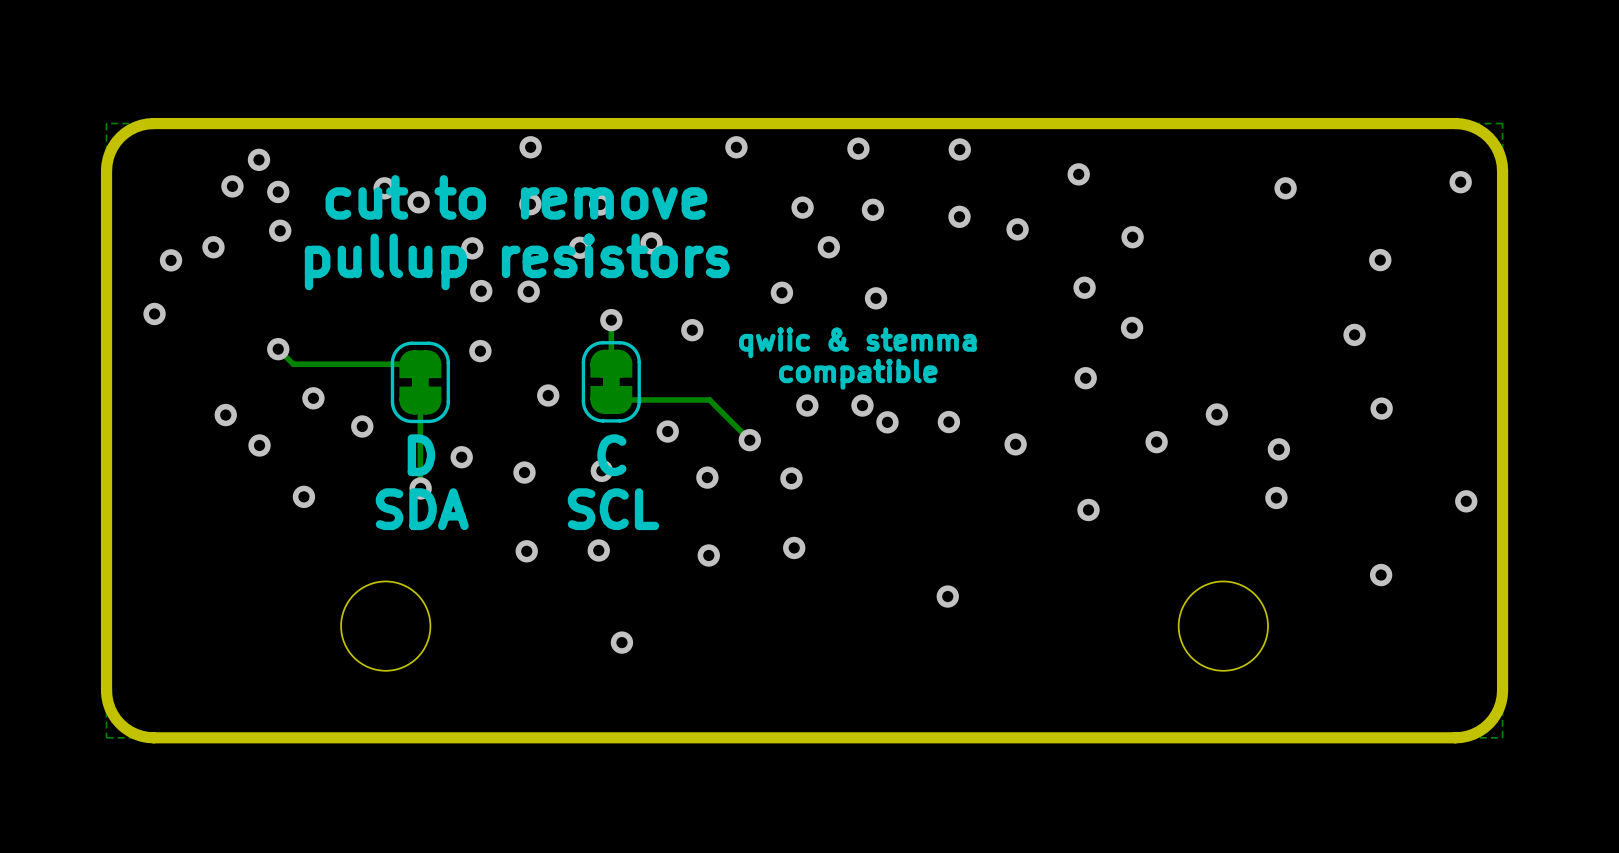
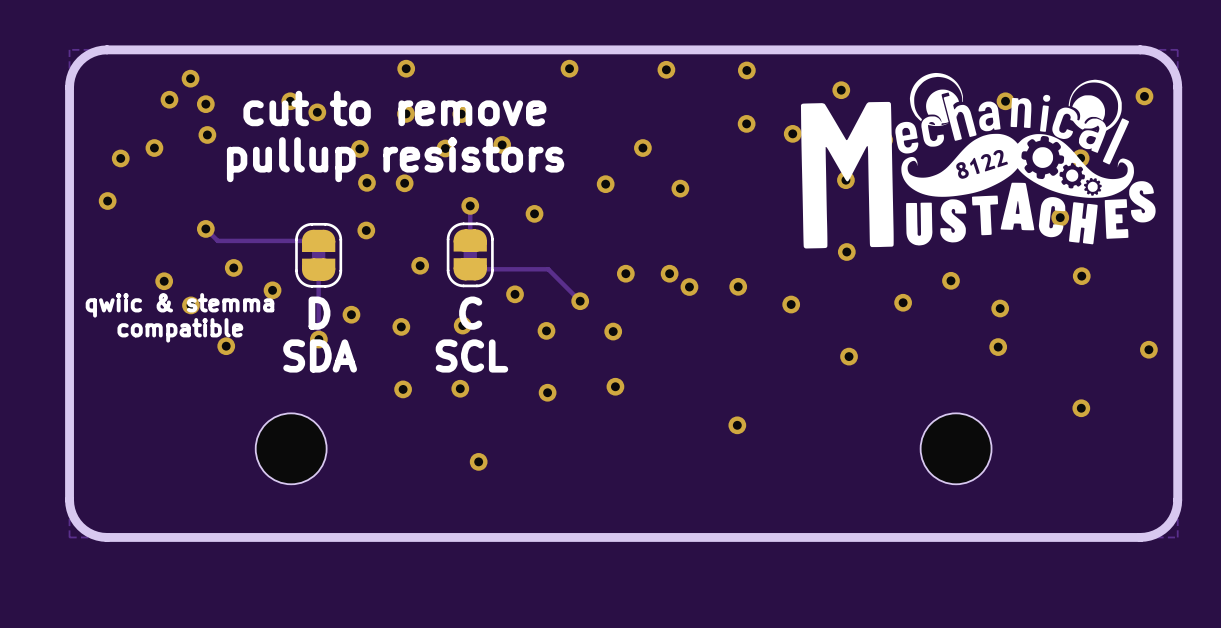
drawing: none -> [800, 72, 1156, 249]
via: (802, 207) -> none
via: (872, 209) -> none
text position: qwiic & stemma (857, 342) -> qwiic & stemma (179, 305)
text position: compatible (858, 374) -> compatible (180, 330)

